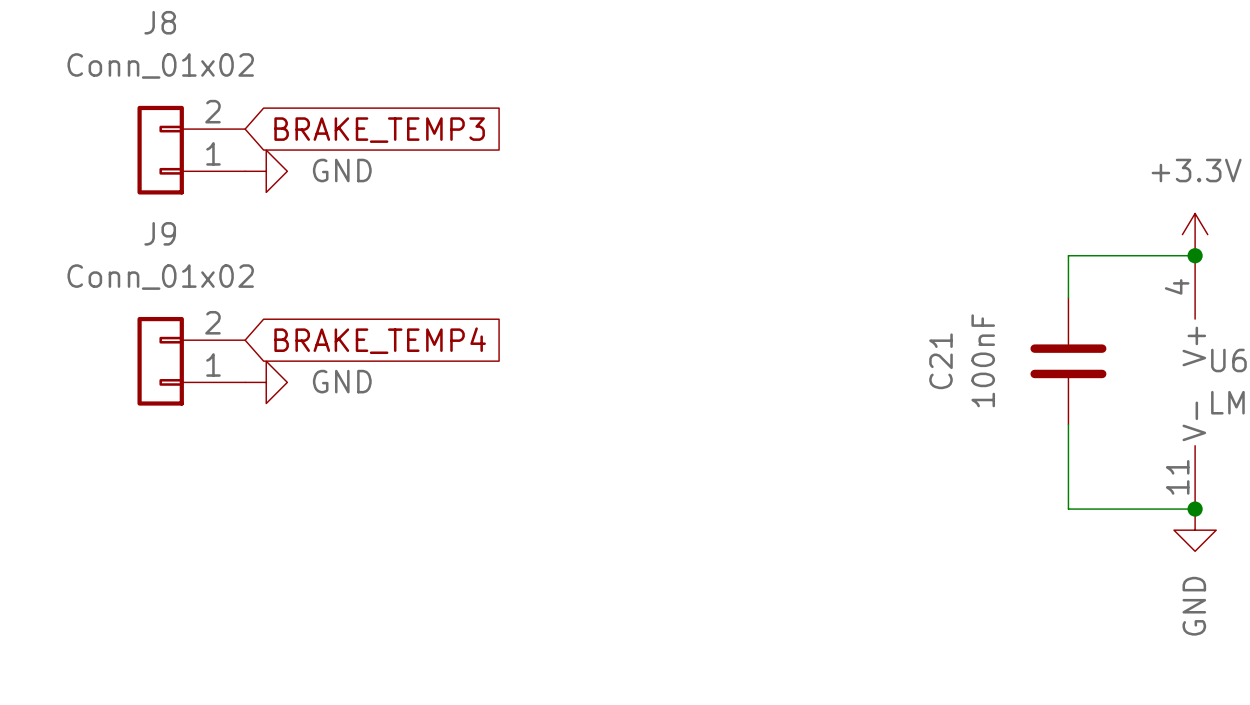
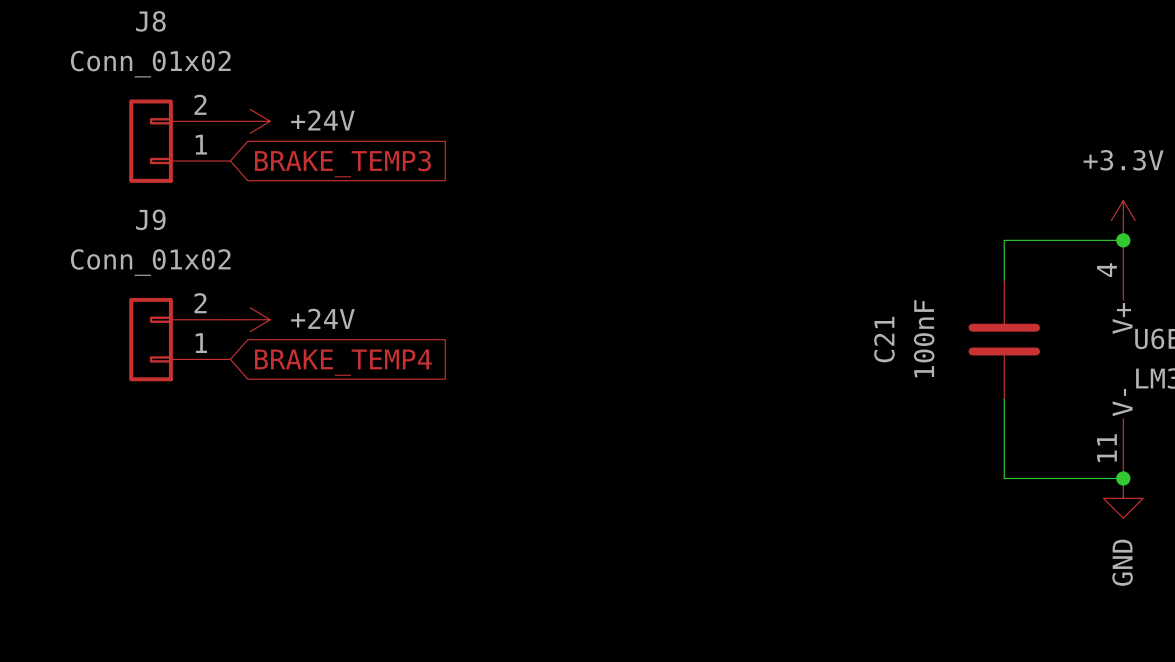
power symbol: none -> +24V (250, 121)
global label position: BRAKE_TEMP3 (379, 130) -> BRAKE_TEMP3 (342, 164)
power symbol: GND (266, 171) -> none
power symbol: none -> +24V (250, 319)
global label position: BRAKE_TEMP4 (380, 340) -> BRAKE_TEMP4 (343, 362)
power symbol: GND (266, 382) -> none

